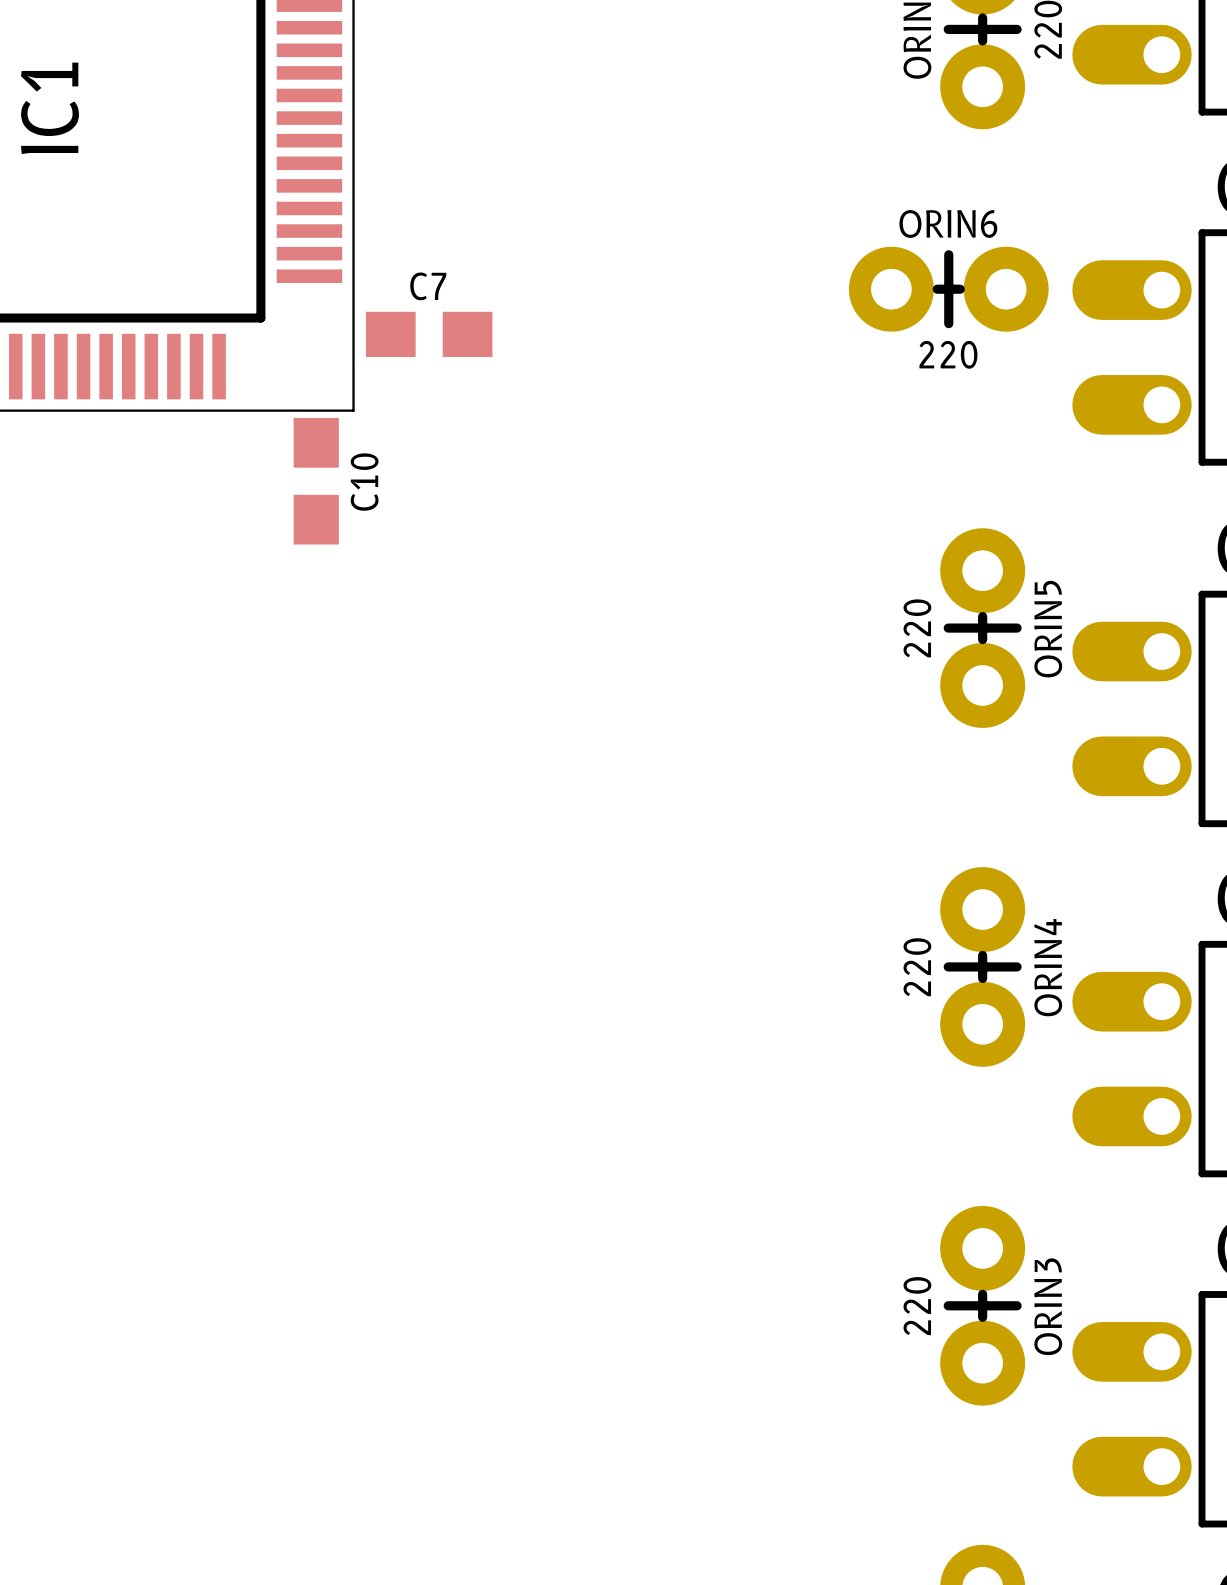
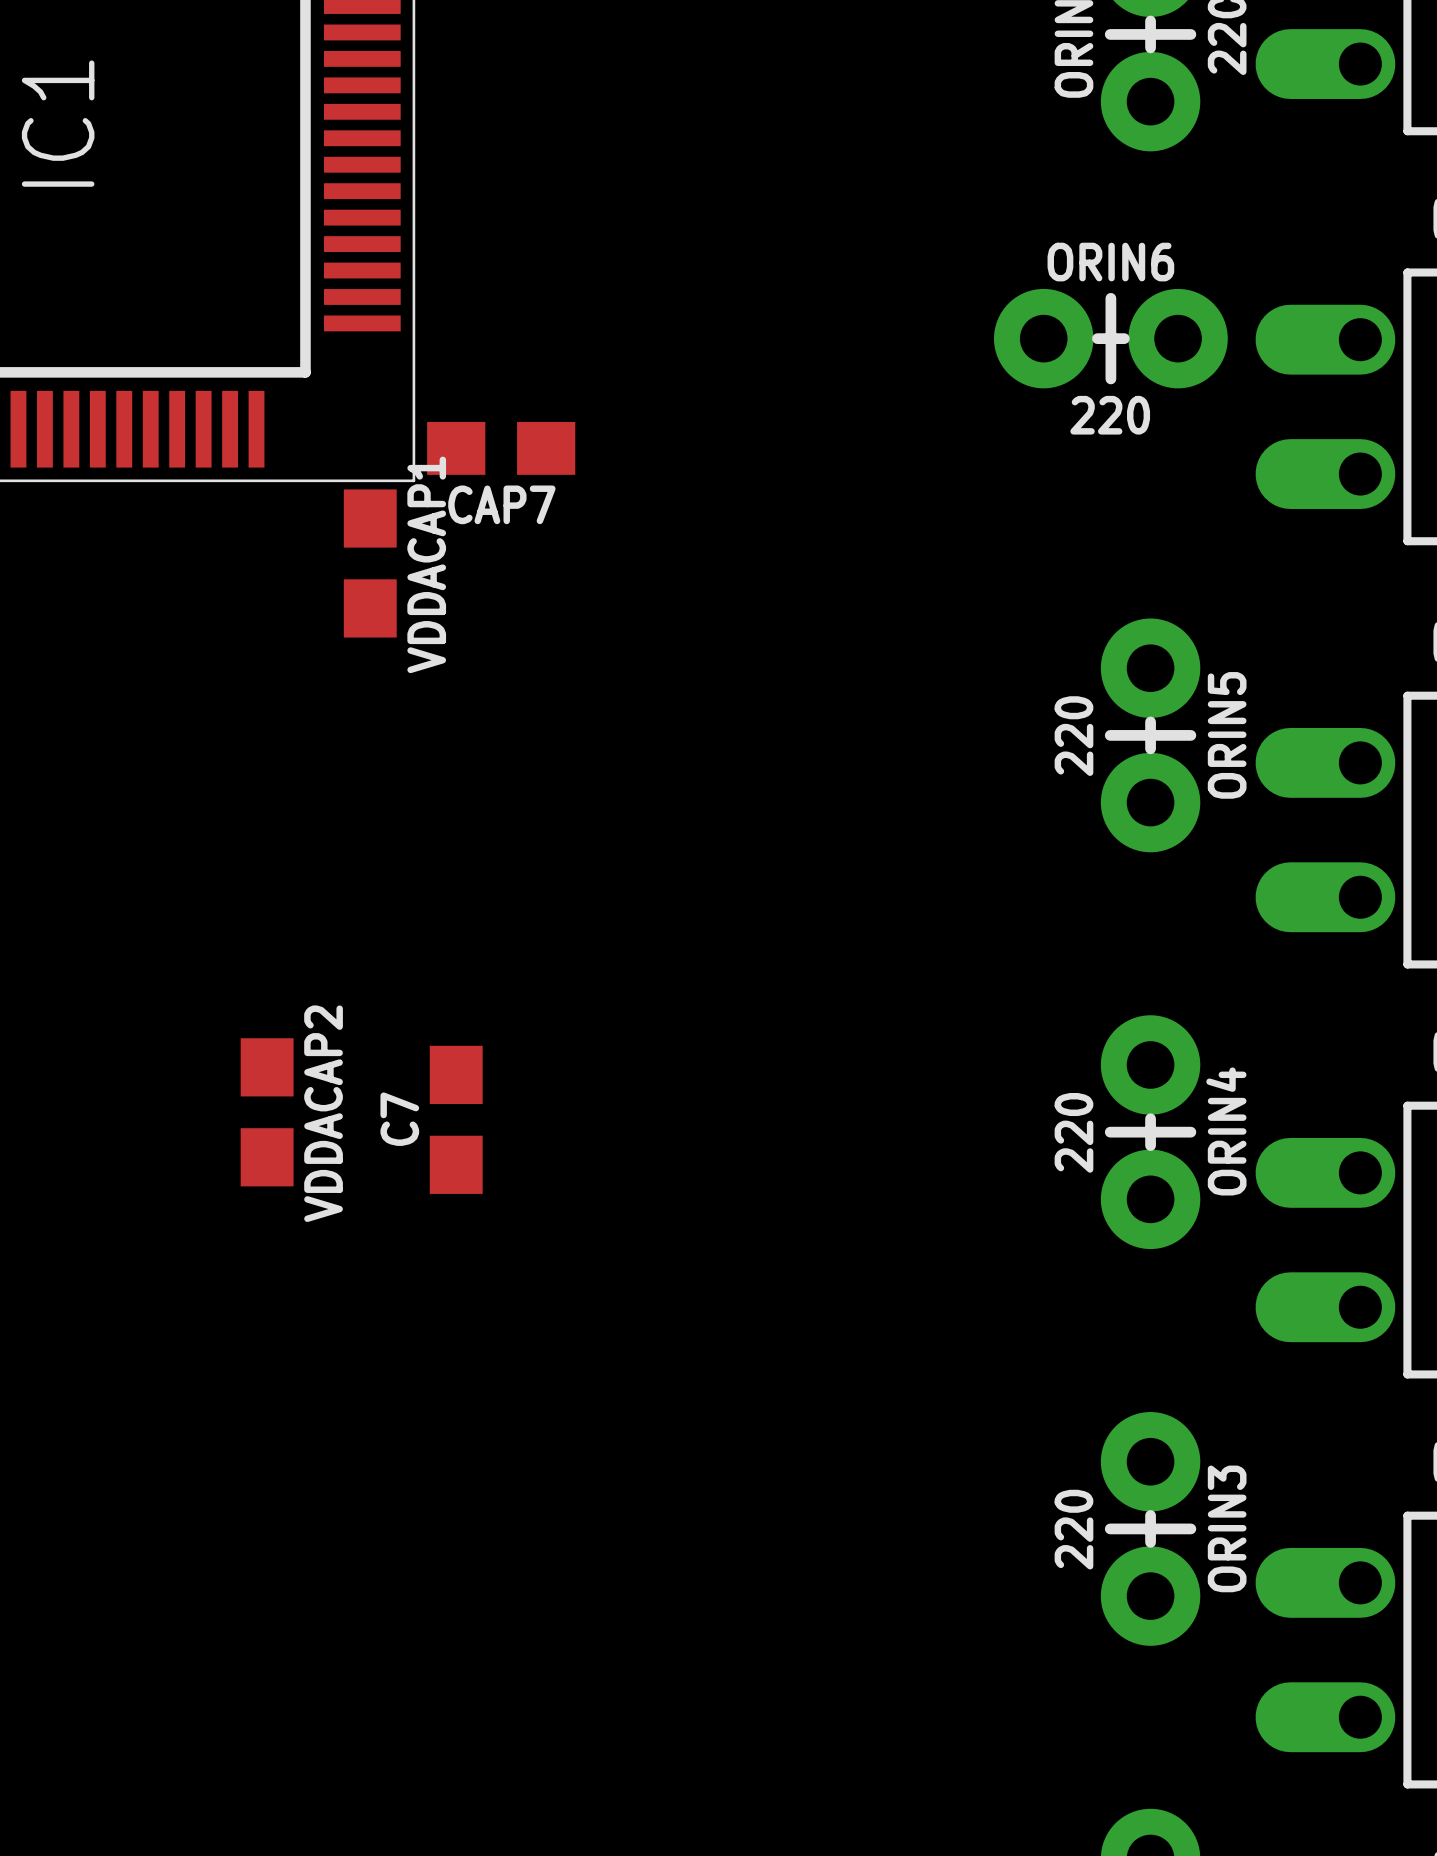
C7 rotation: 0° (429, 334) -> 90° clockwise (456, 1119)
C7 position: (429, 334) -> (456, 1119)
CAP7: none -> (501, 448)
C10 name: C10 (364, 482) -> VDDACAP1 (426, 564)
VDDACAP2: none -> (267, 1112)

